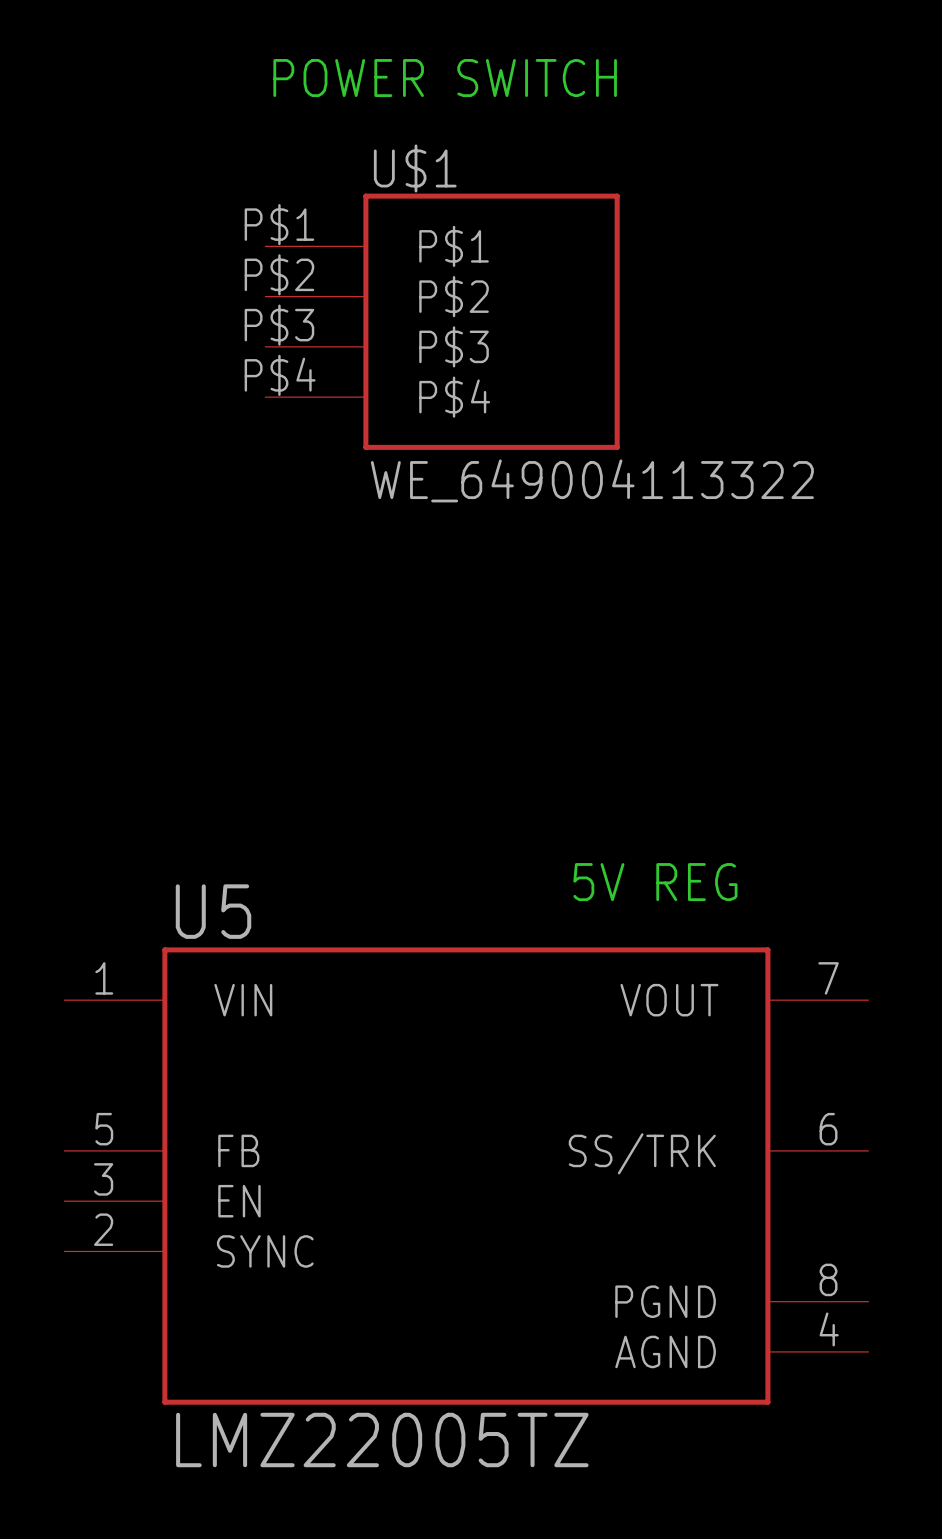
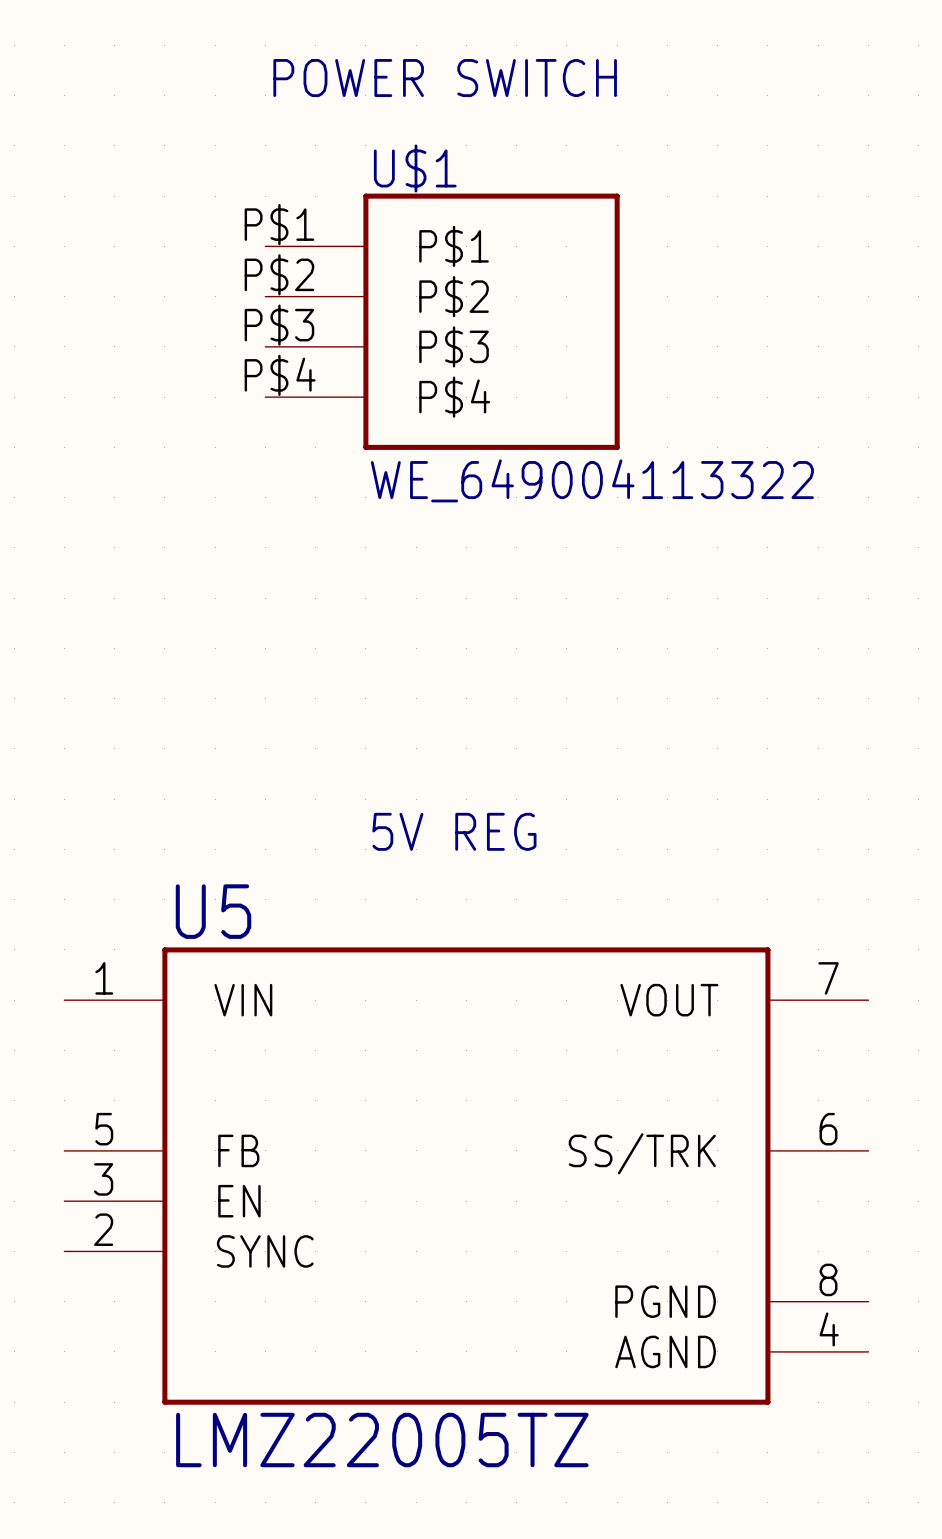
text position: 5V REG (655, 882) -> 5V REG (454, 831)

